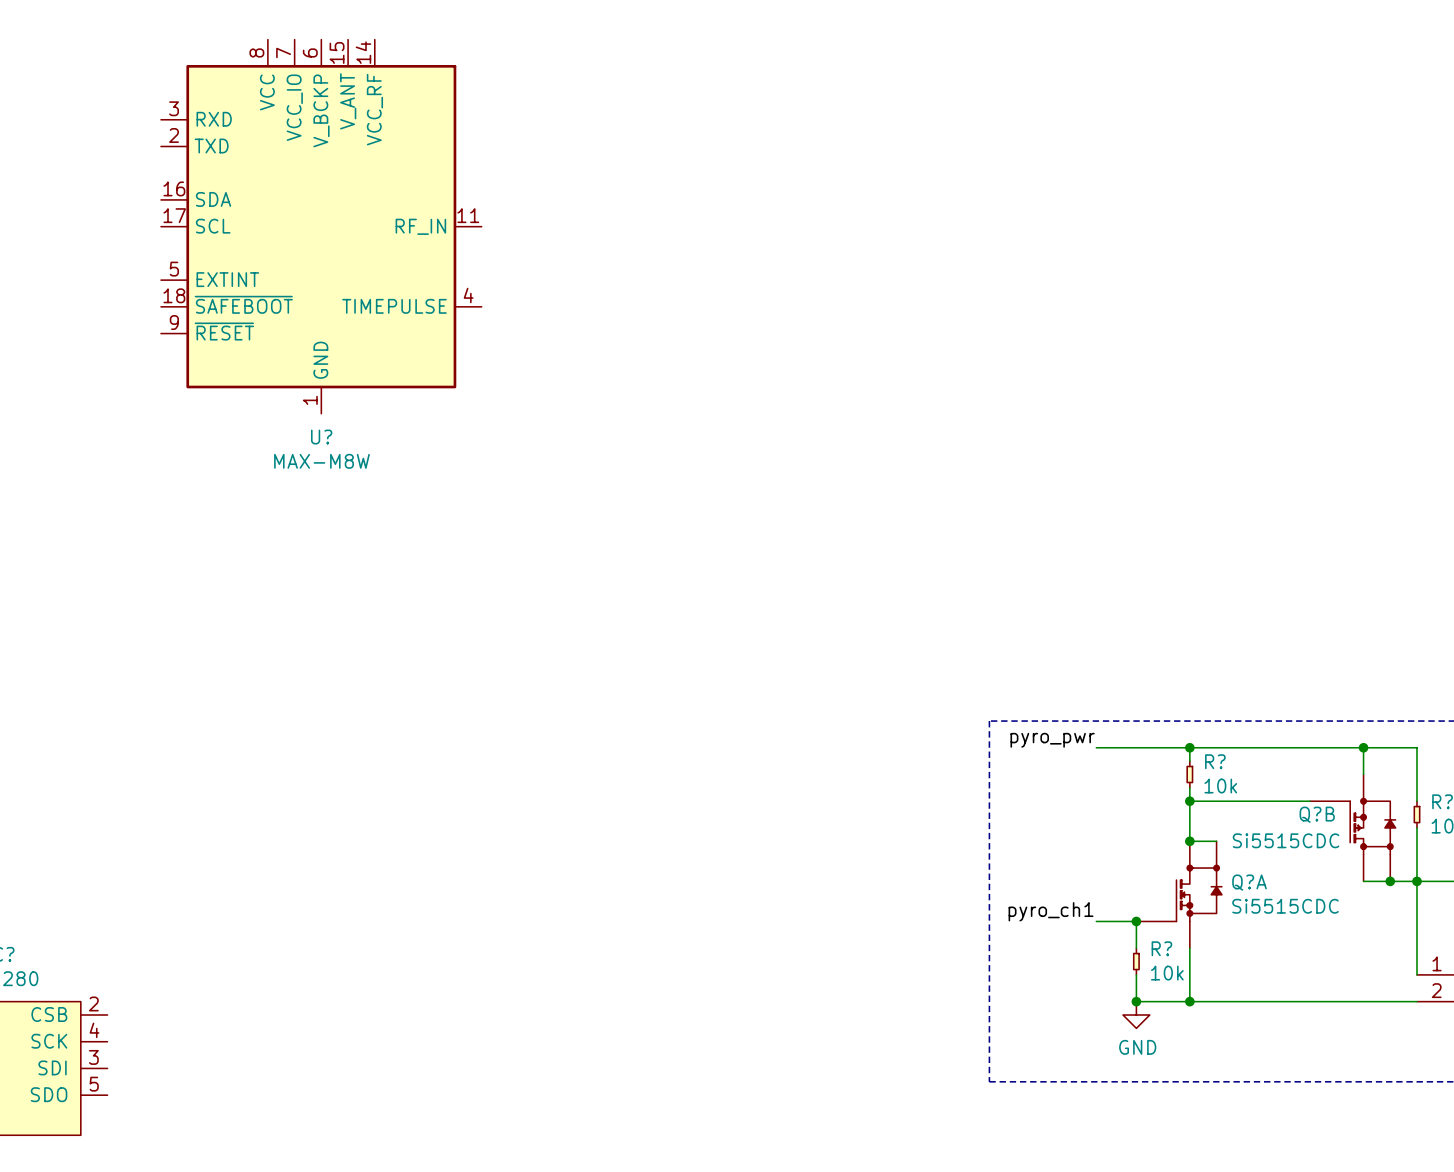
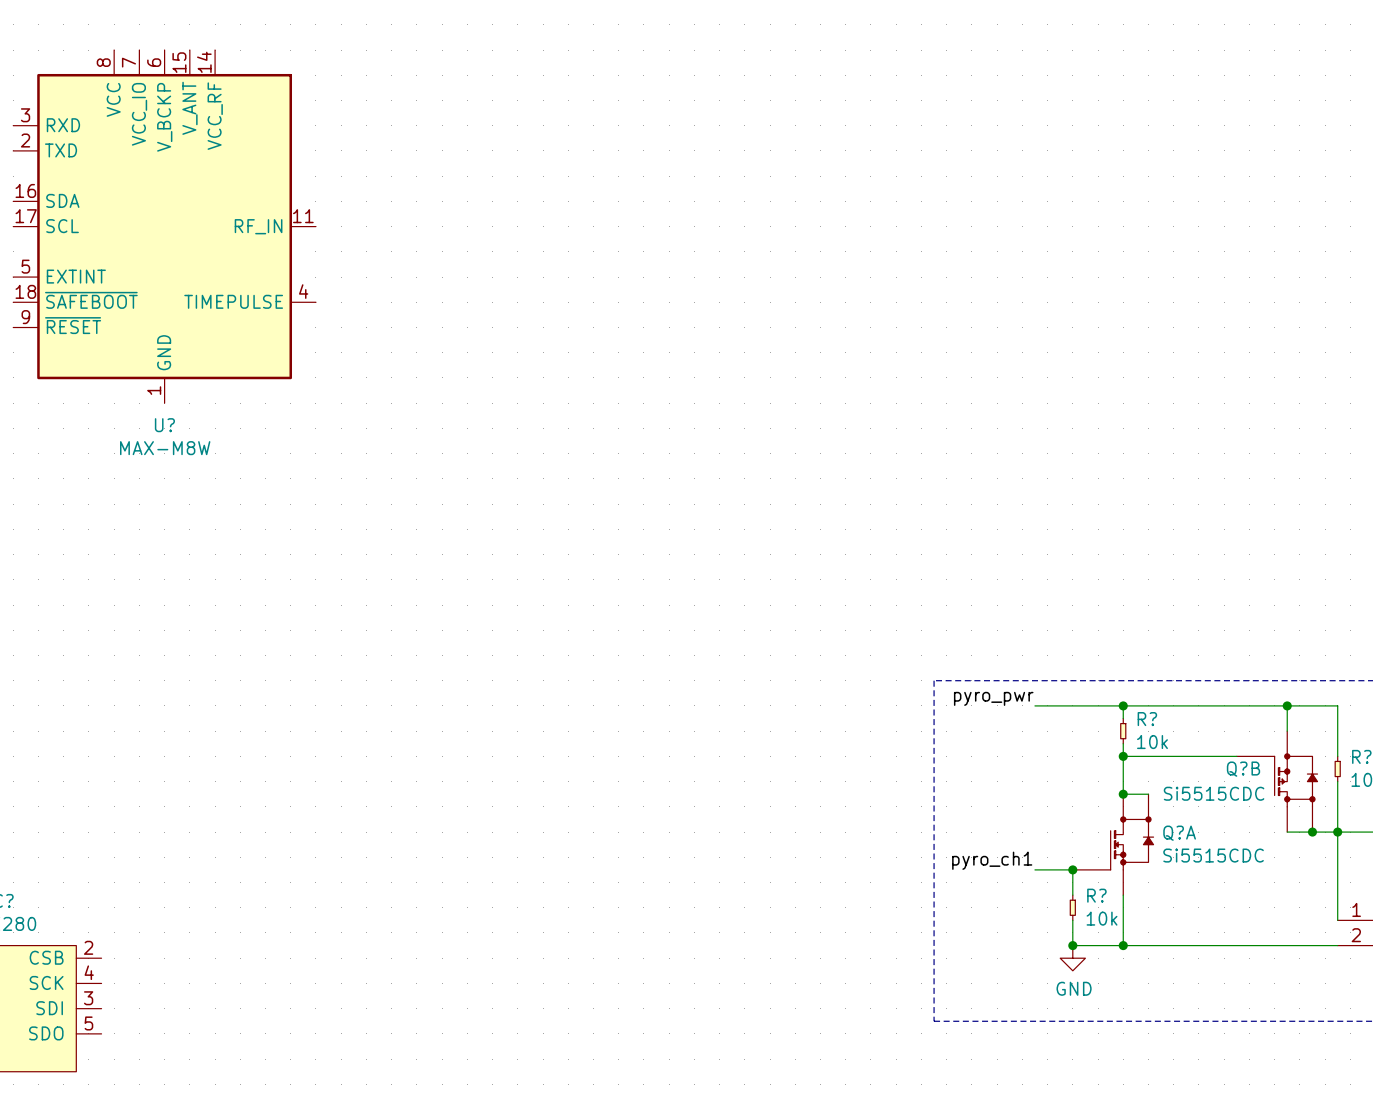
U? position: (321, 226) -> (164, 226)

